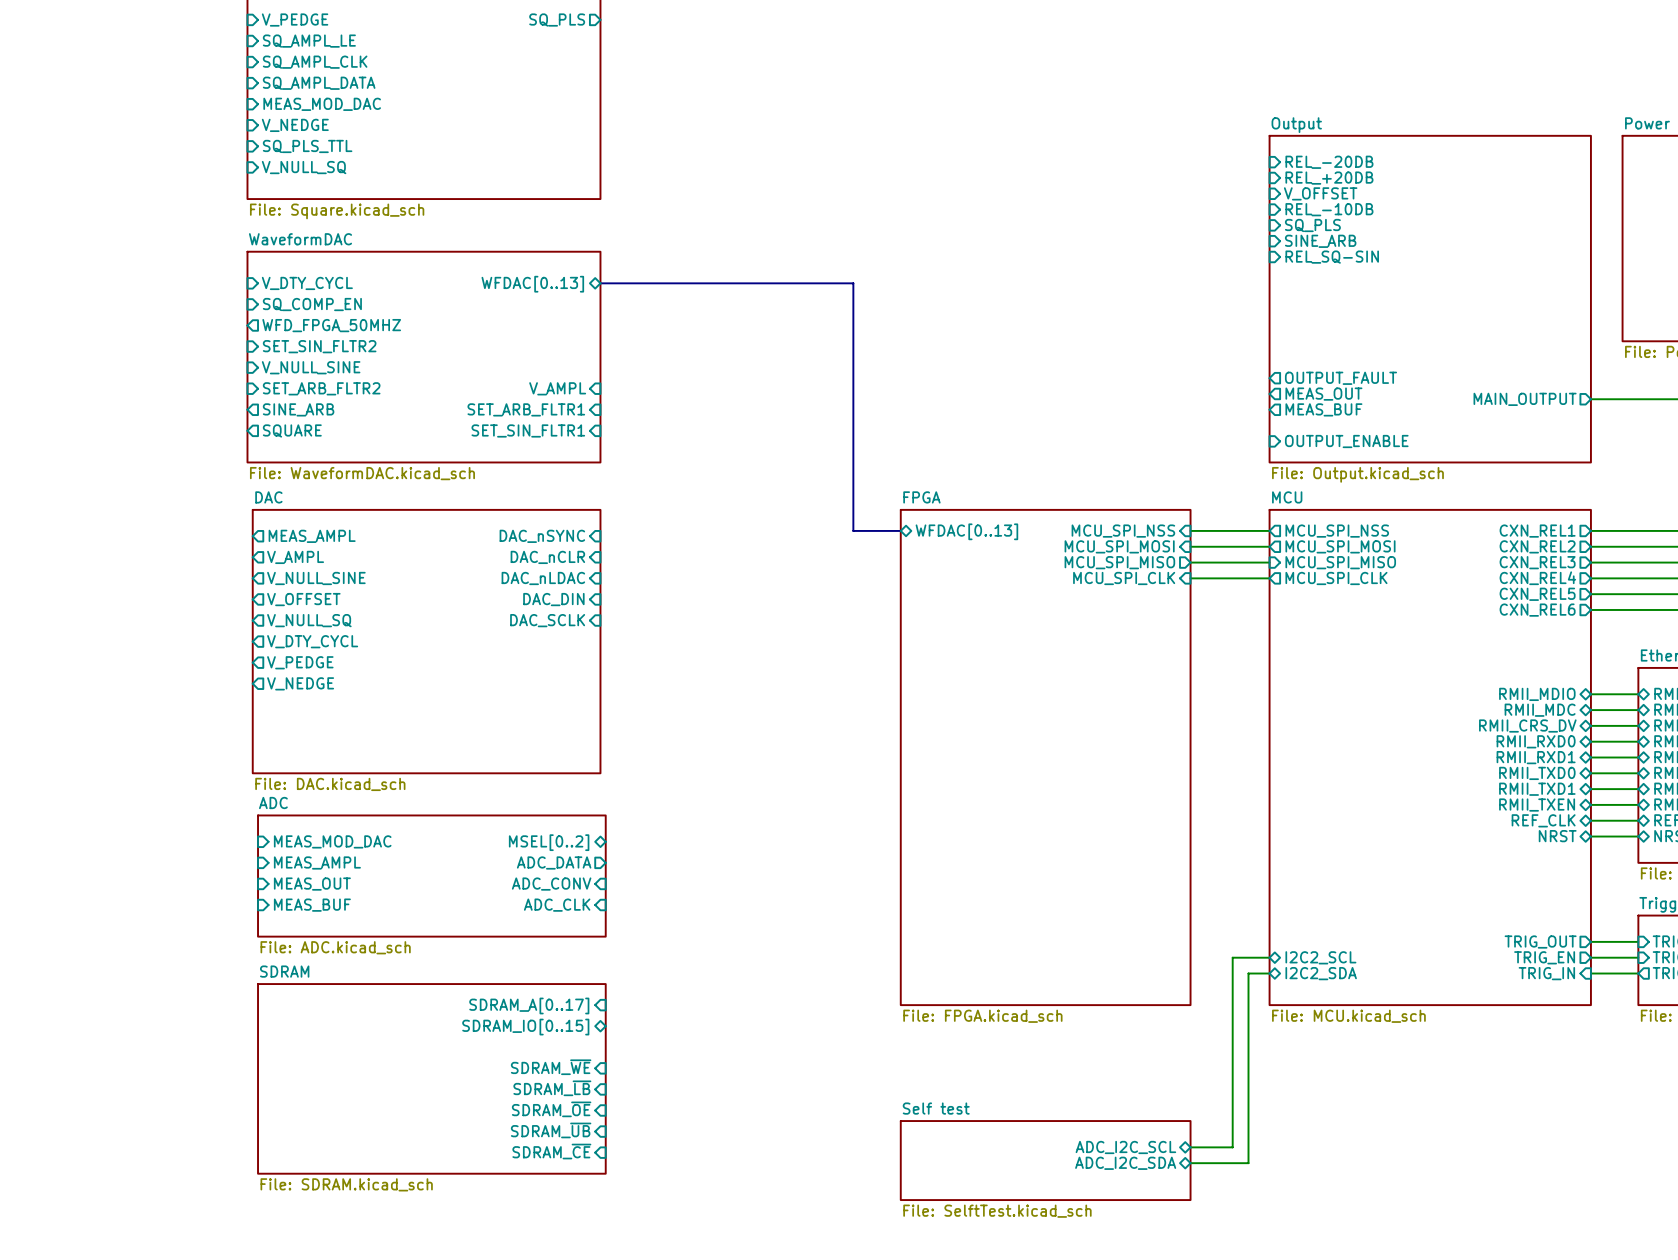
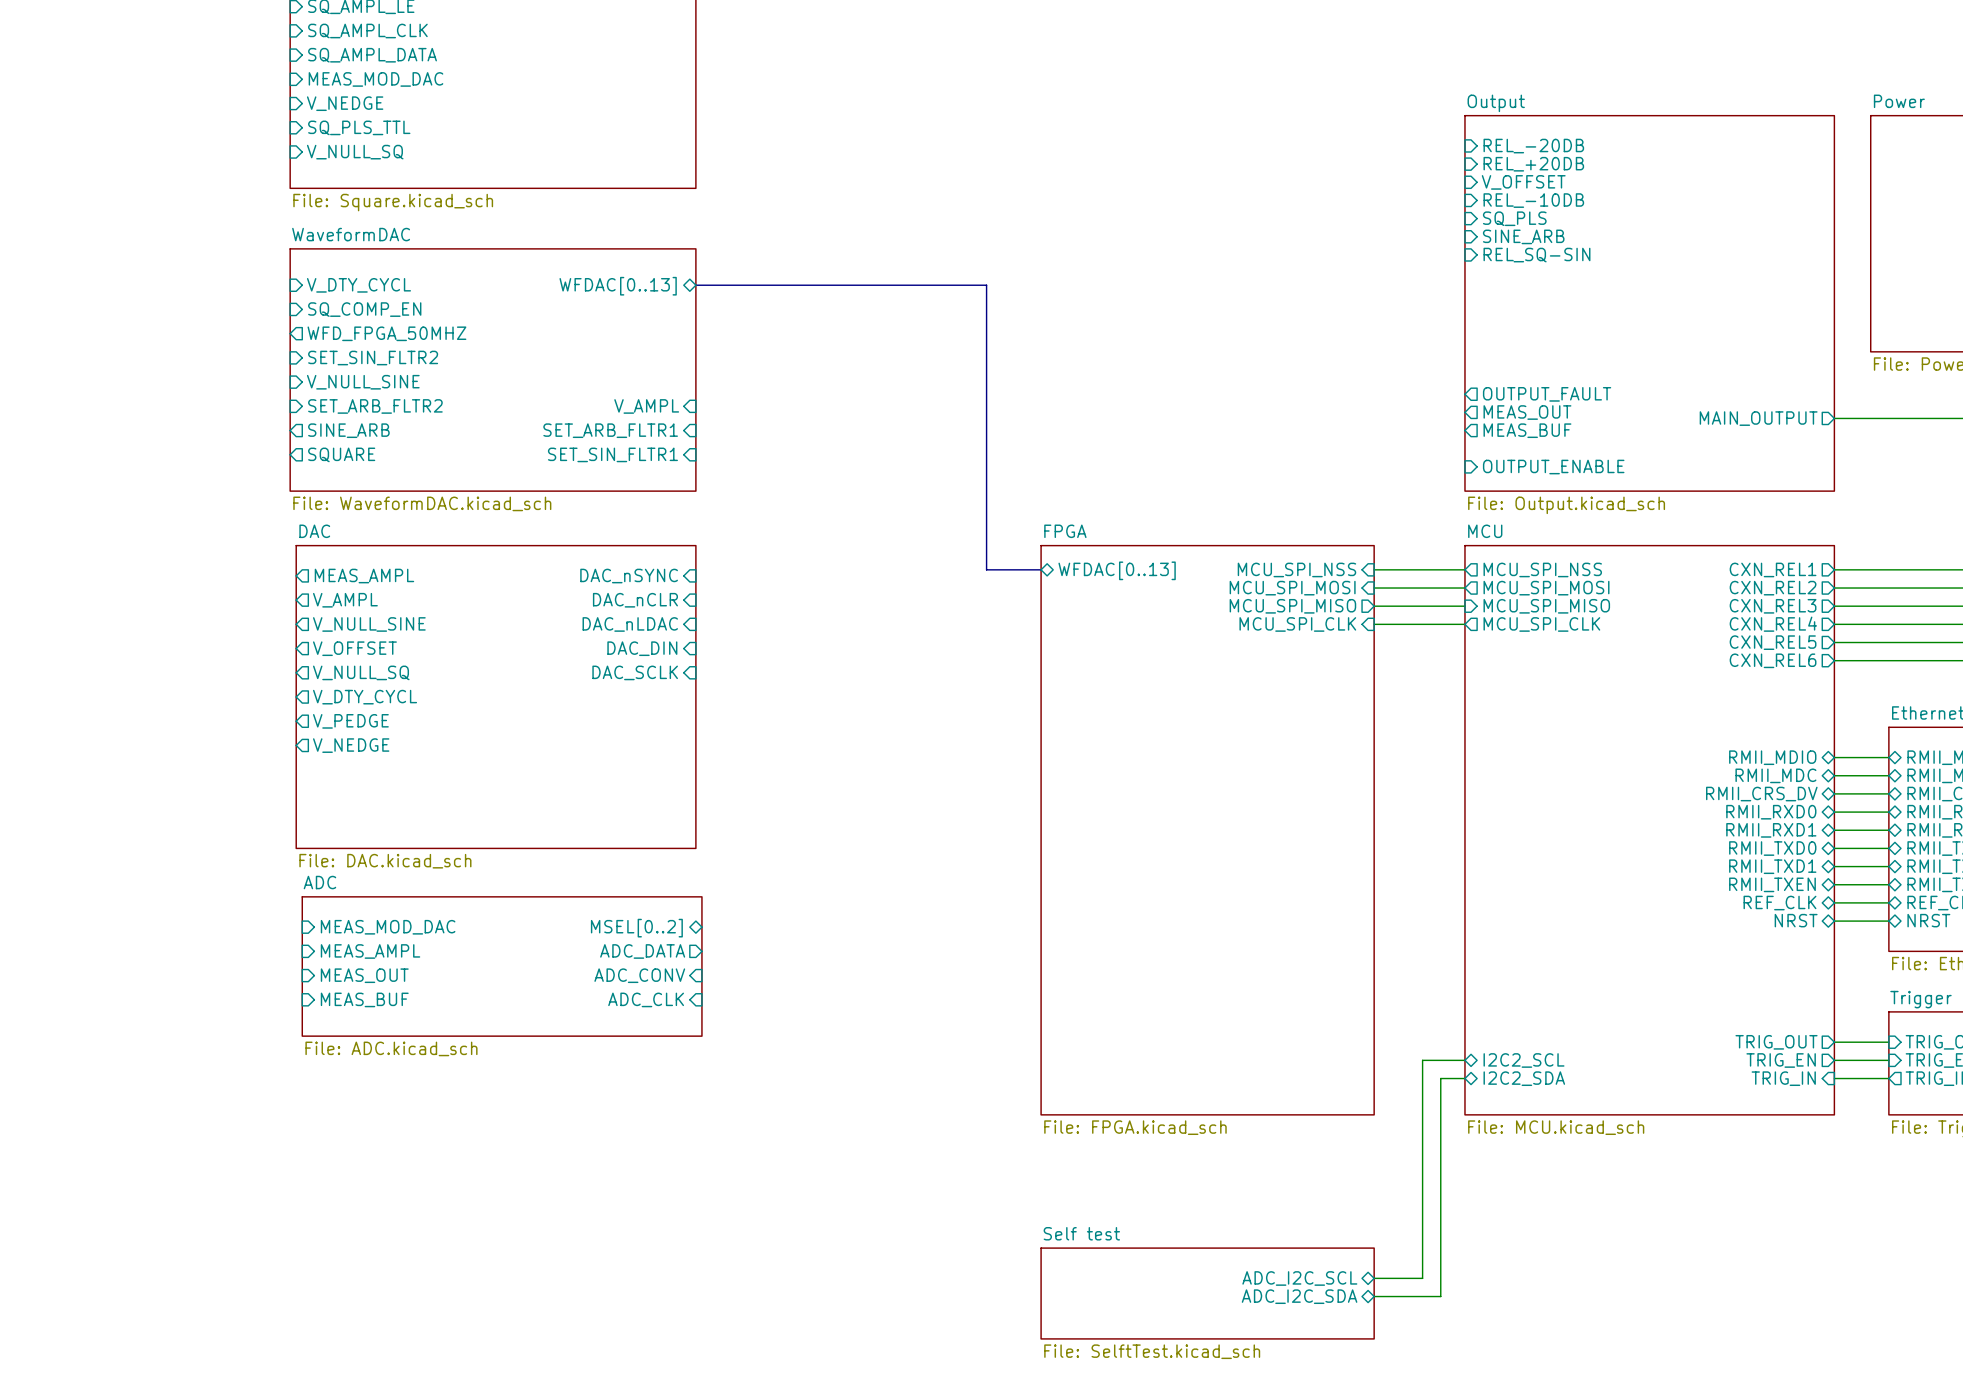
sheet pin: SDRAM_A[0..17] (529, 1005) -> none
sheet pin: SDRAM_IO[0..15] (525, 1027) -> none
sheet pin: SDRAM_~{WE} (551, 1067) -> none
sheet SDRAM: File: SDRAM.kicad_sch (431, 1078) -> none
sheet pin: SDRAM_~{LB} (552, 1088) -> none
sheet pin: SDRAM_~{OE} (551, 1109) -> none
sheet pin: SDRAM_~{UB} (551, 1130) -> none
sheet pin: SDRAM_~{CE} (551, 1151) -> none

